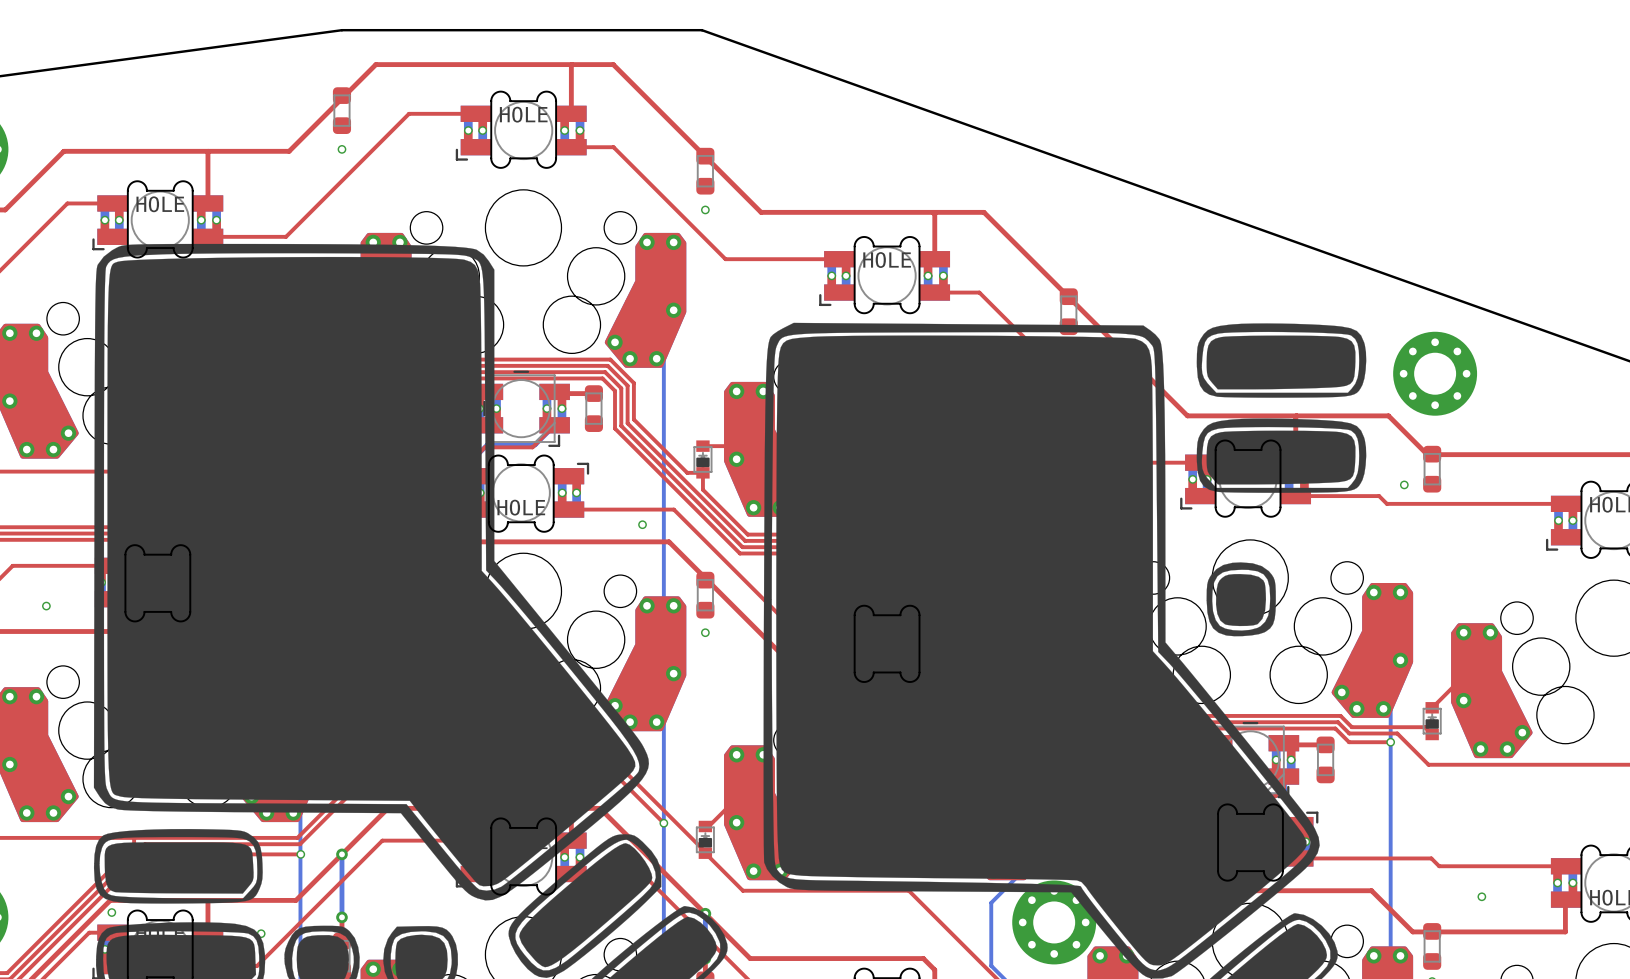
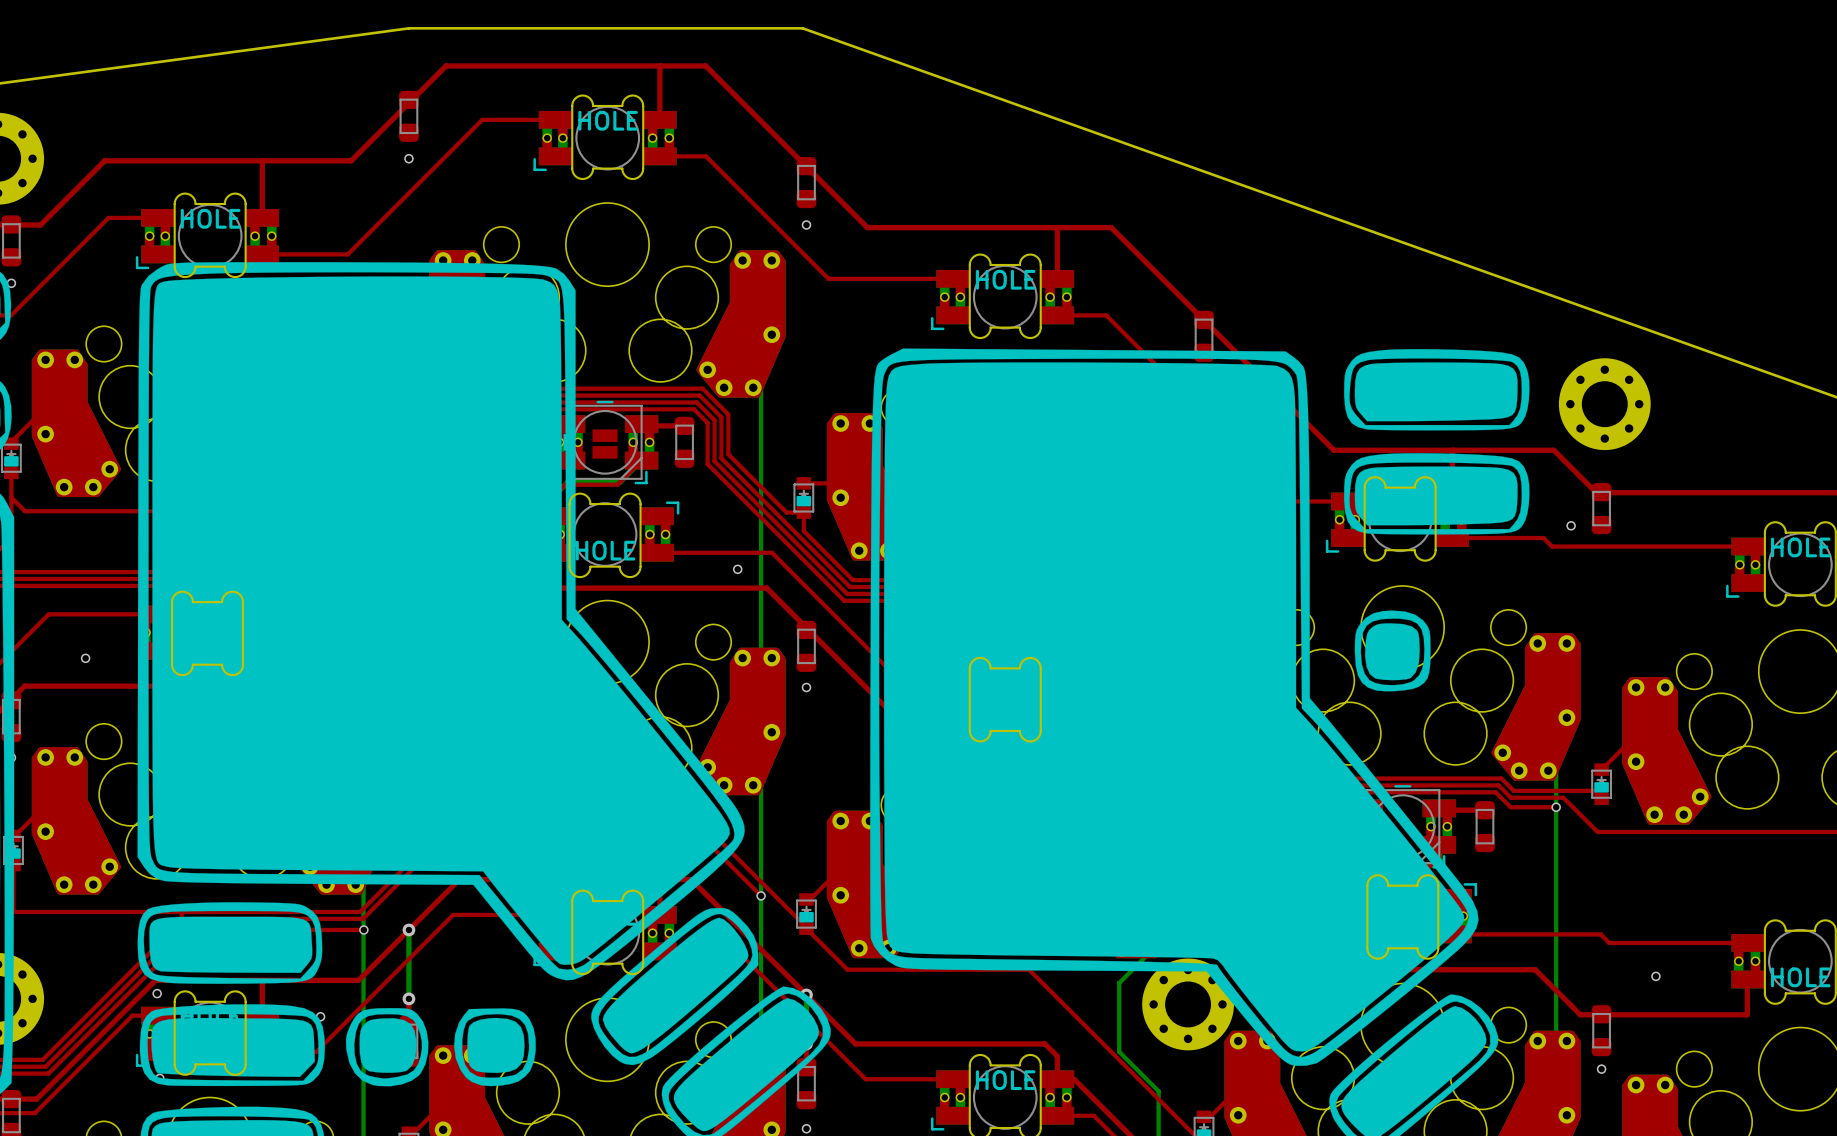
part: none -> (605, 444)

